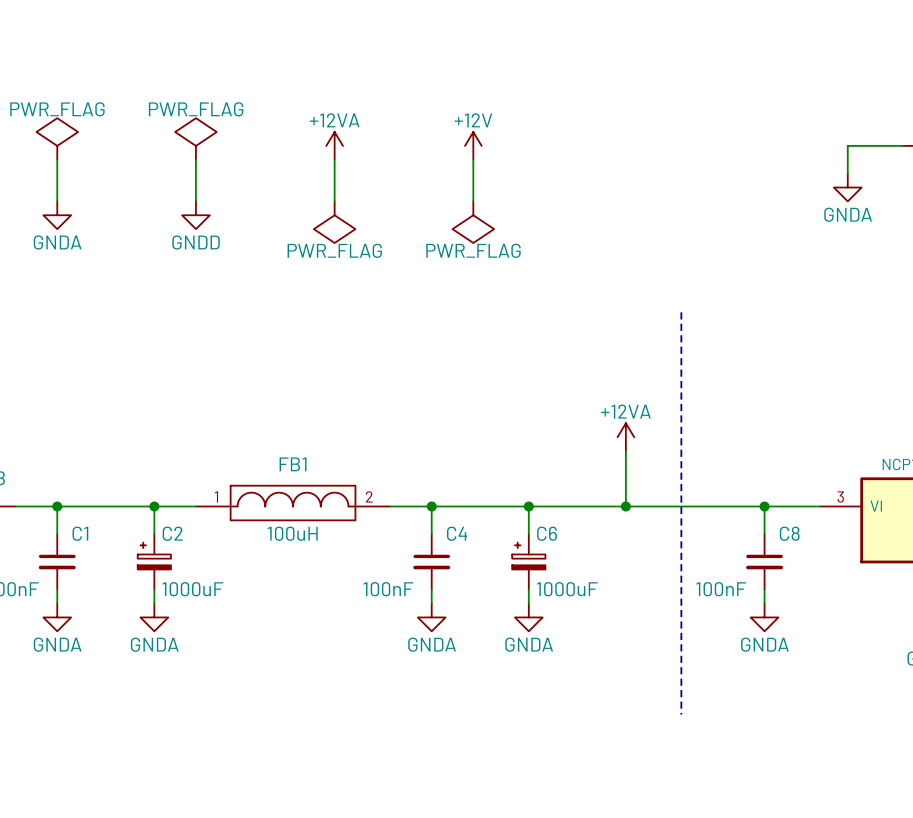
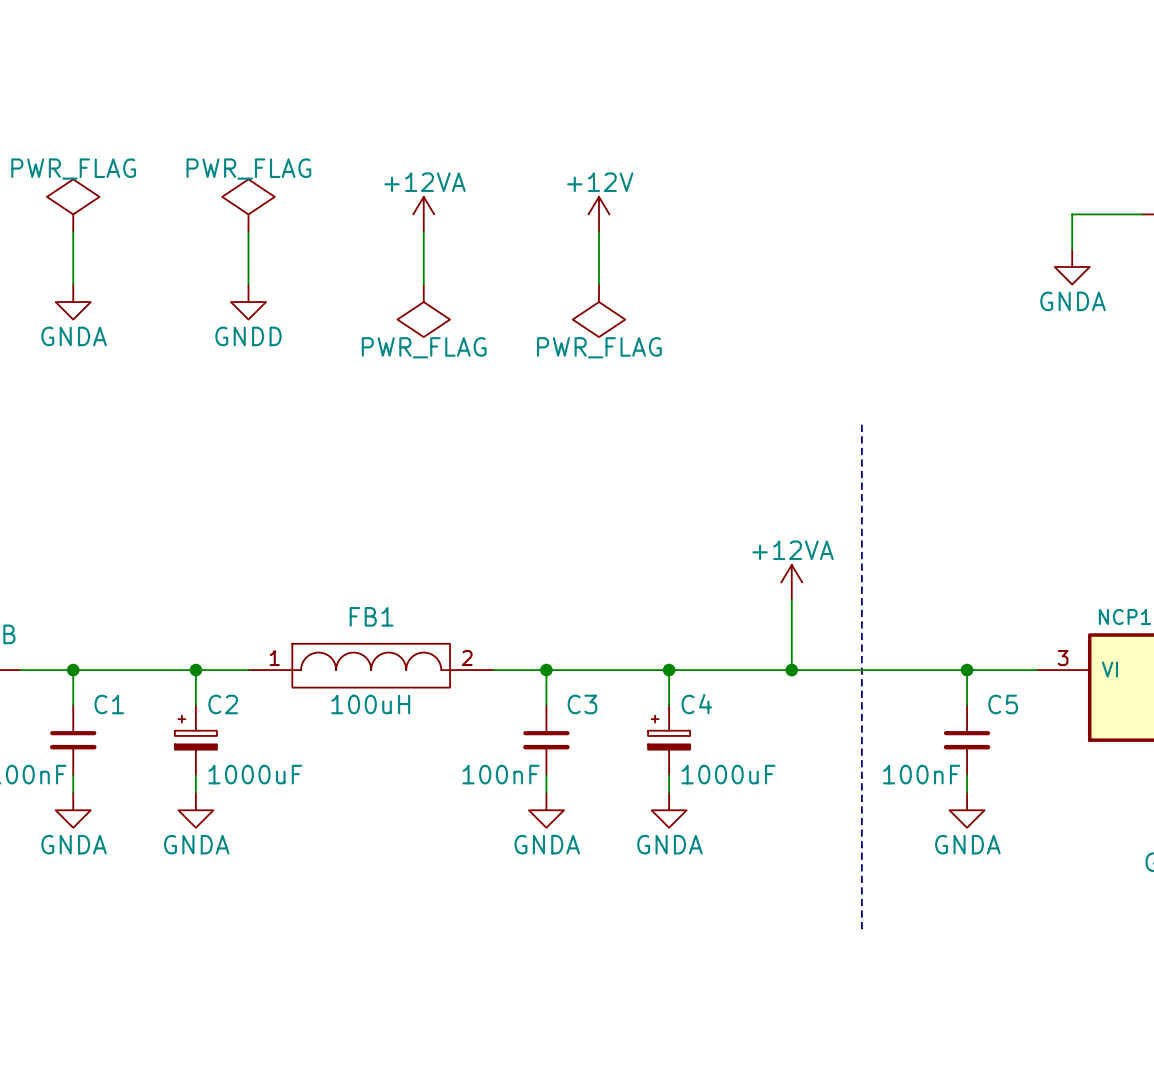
C4 name: C4 (457, 533) -> C3 (582, 704)
C6 name: C6 (547, 533) -> C4 (696, 704)
C8 name: C8 (789, 533) -> C5 (1003, 704)

